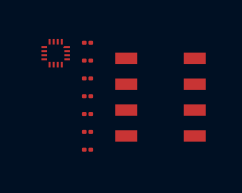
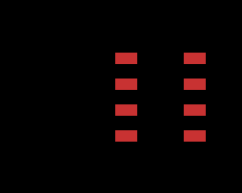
part: (87, 42) -> none
part: (55, 53) -> none
part: (87, 60) -> none
part: (87, 78) -> none
part: (87, 96) -> none
part: (87, 114) -> none
part: (87, 131) -> none
part: (87, 149) -> none

